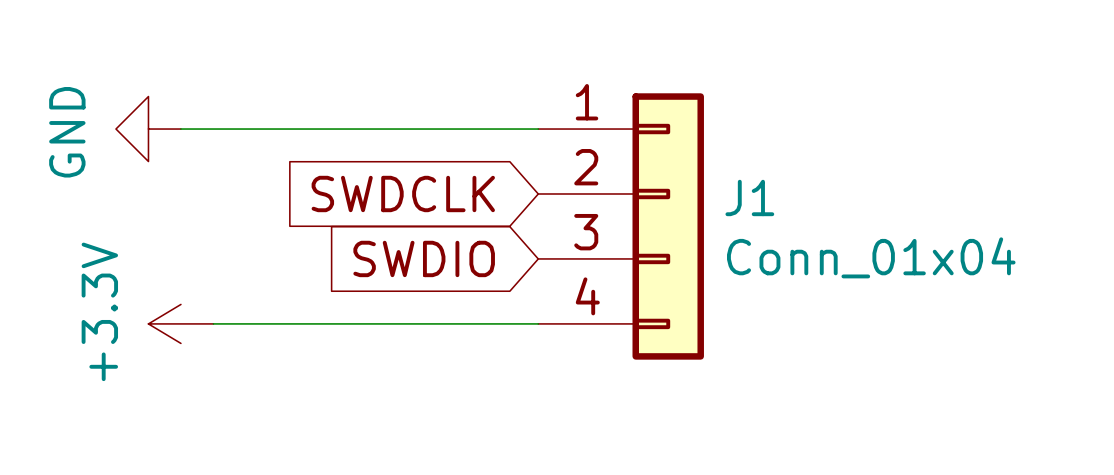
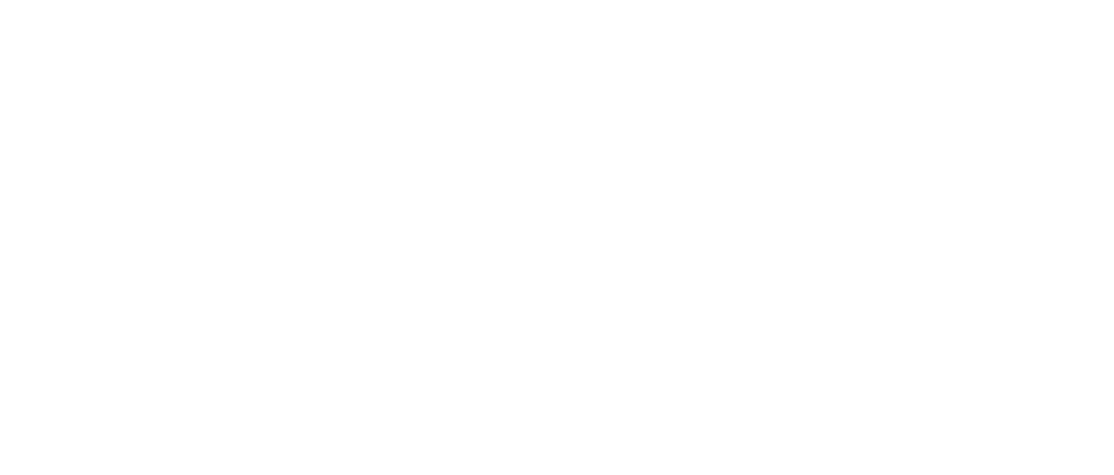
power symbol: GND (148, 129) -> none
wire: (180, 129) (538, 129) -> none
global label: SWDCLK (403, 193) -> none
J1: Conn_01x04 (621, 226) -> none
global label: SWDIO (424, 258) -> none
power symbol: +3.3V (180, 323) -> none
wire: (213, 323) (538, 323) -> none

